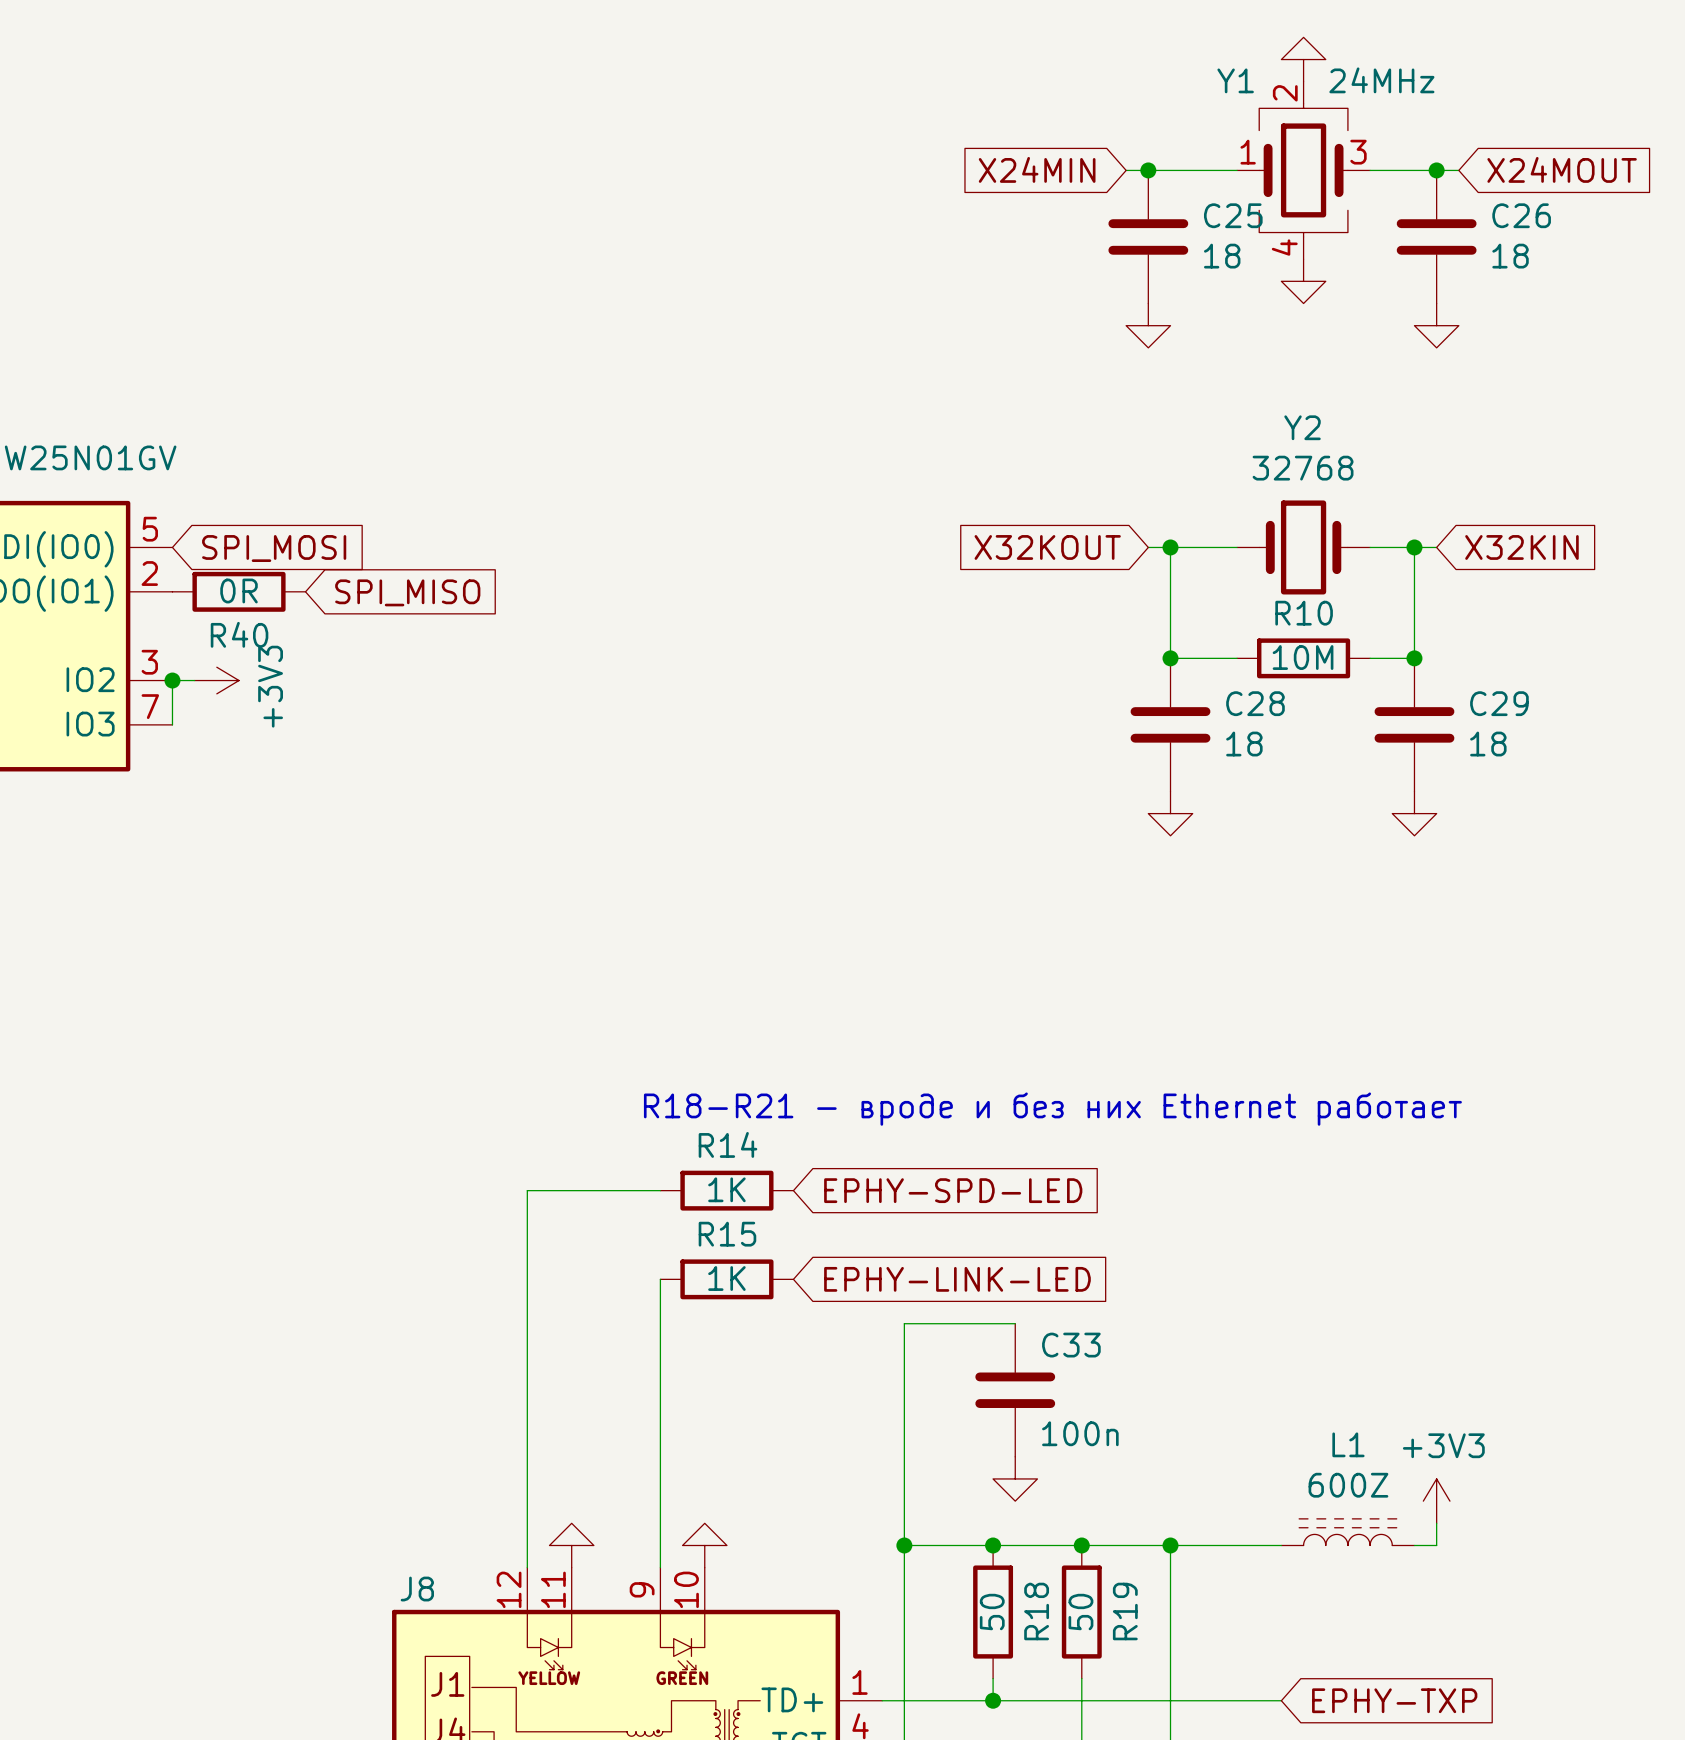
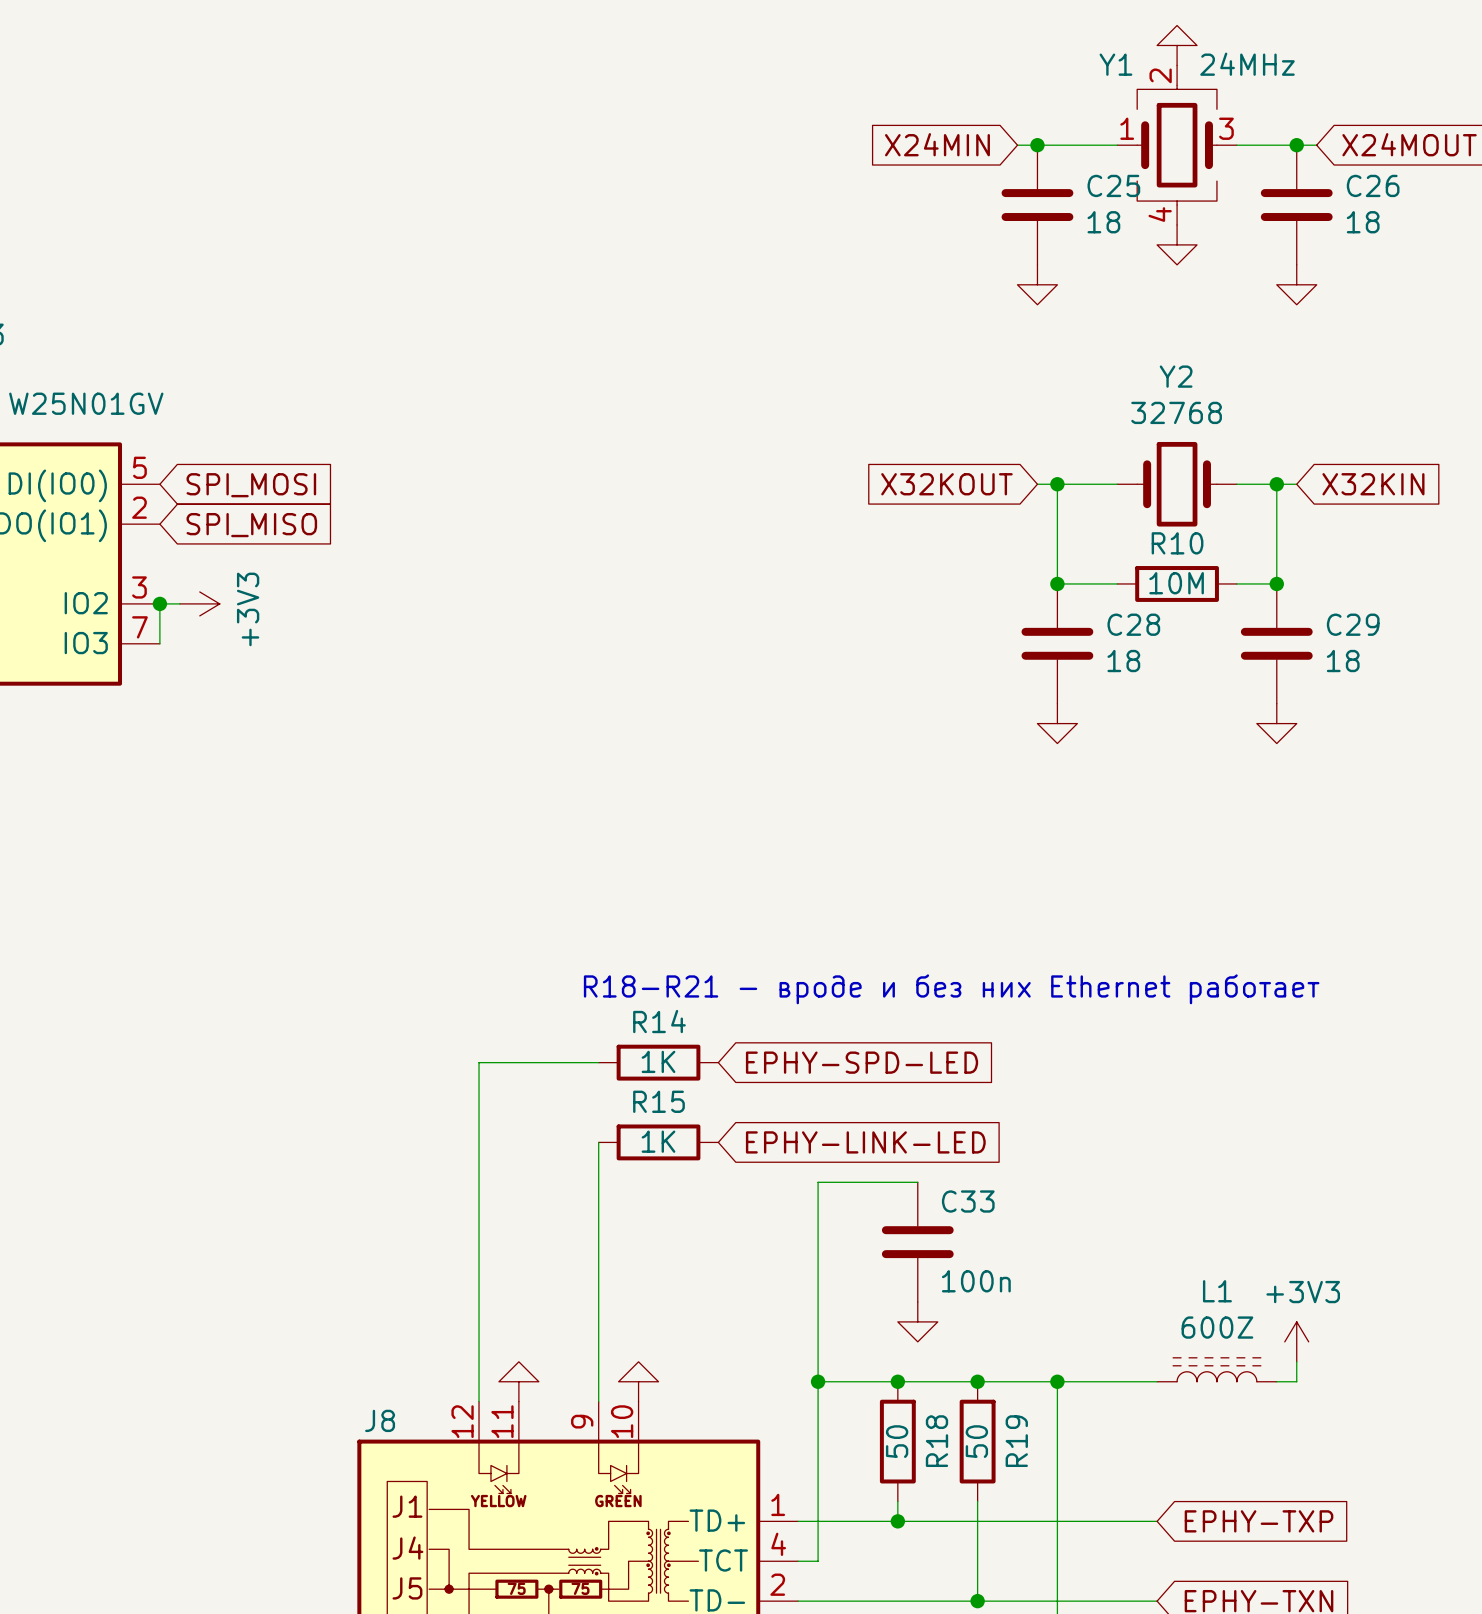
R40: 0R (239, 591) -> none
global label position: SPI_MISO (407, 592) -> SPI_MISO (251, 525)

